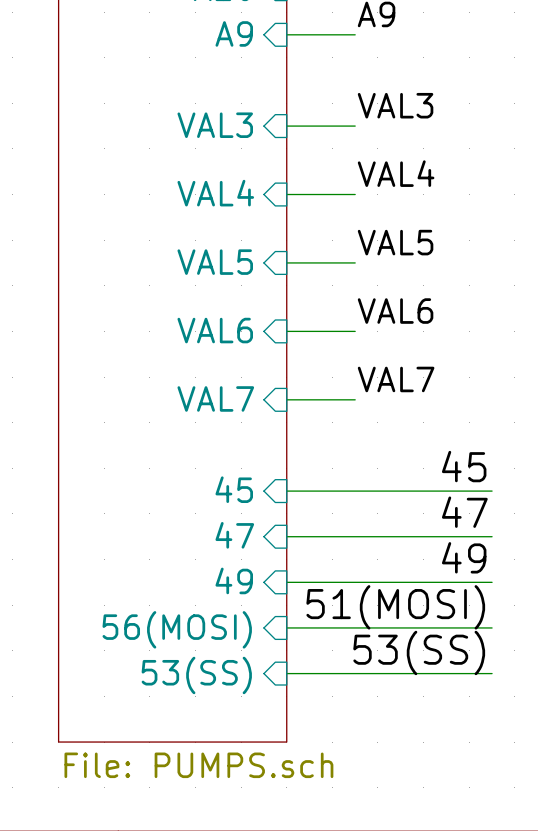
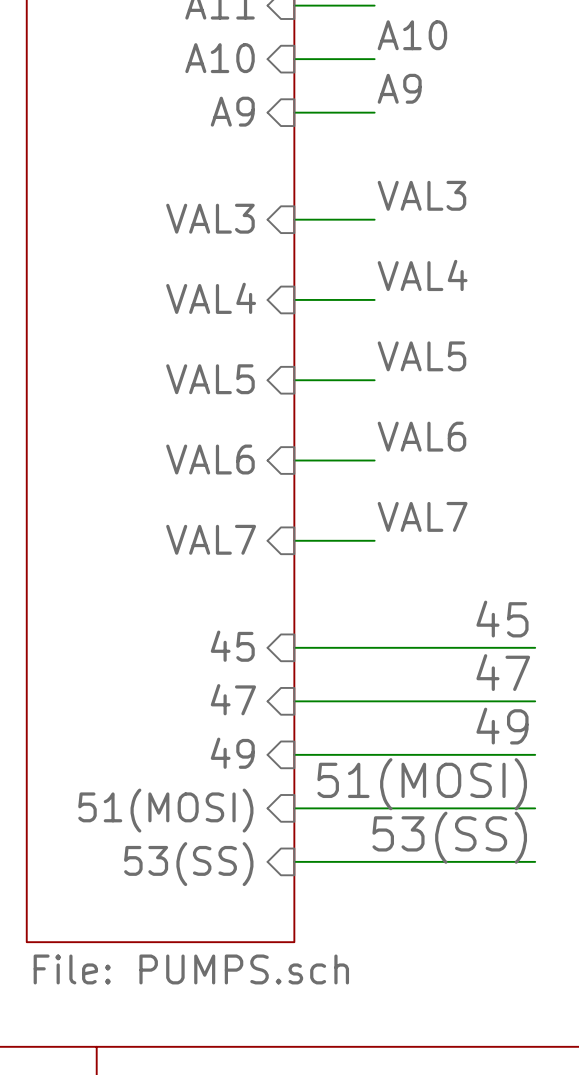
sheet pin: 56(MOSI) (177, 629) -> 51(MOSI) (165, 810)

